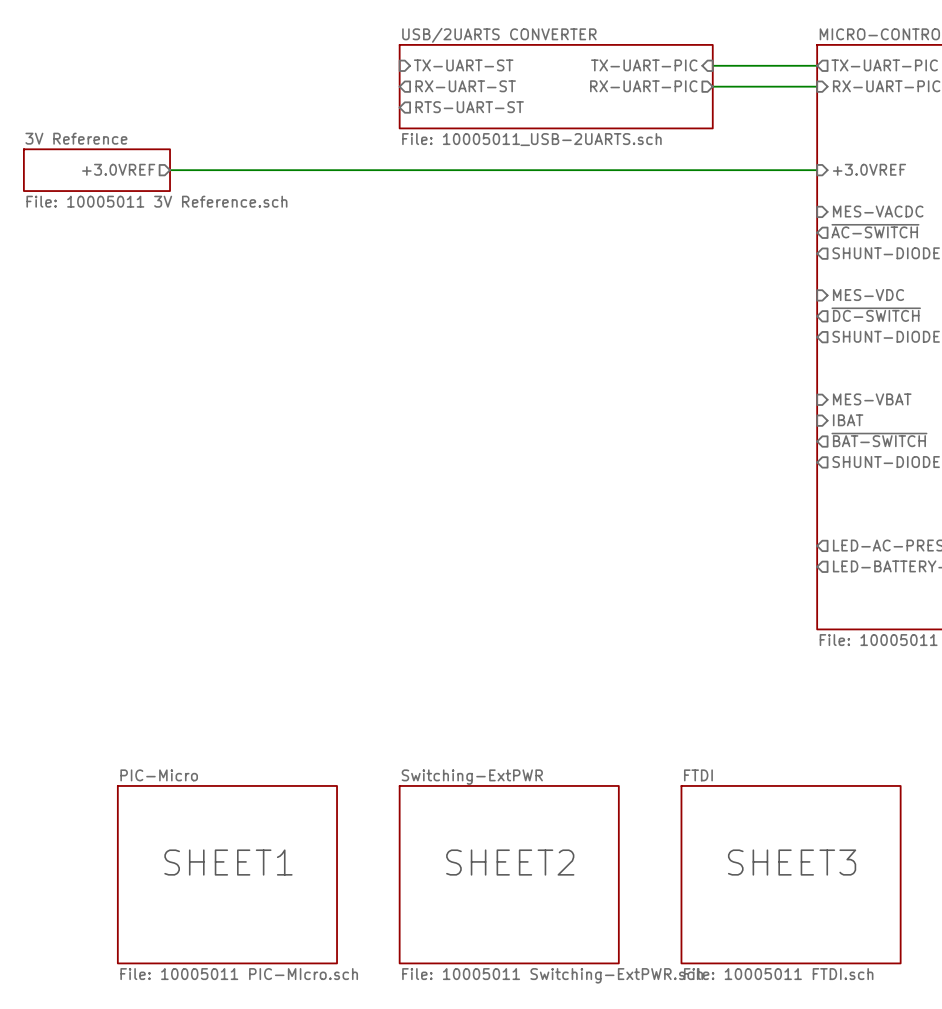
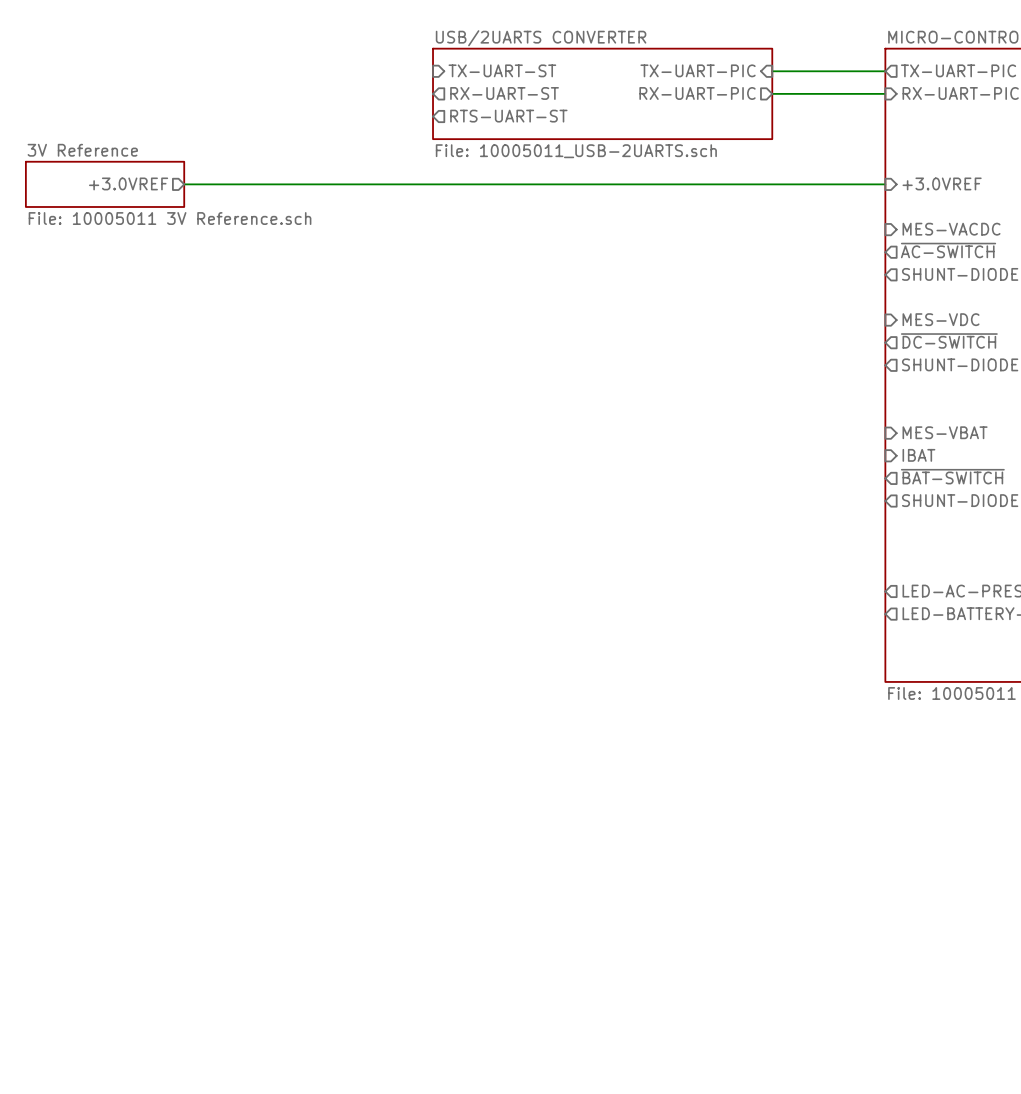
text: SHEET1 (228, 862) -> none
text: SHEET2 (510, 862) -> none
text: SHEET3 (792, 862) -> none
sheet PIC-Micro: File: 10005011 PIC-MIcro.sch (227, 874) -> none
sheet Switching-ExtPWR: File: 10005011 Switching-ExtPWR.sch (509, 874) -> none
sheet FTDI: File: 10005011 FTDI.sch (791, 874) -> none

